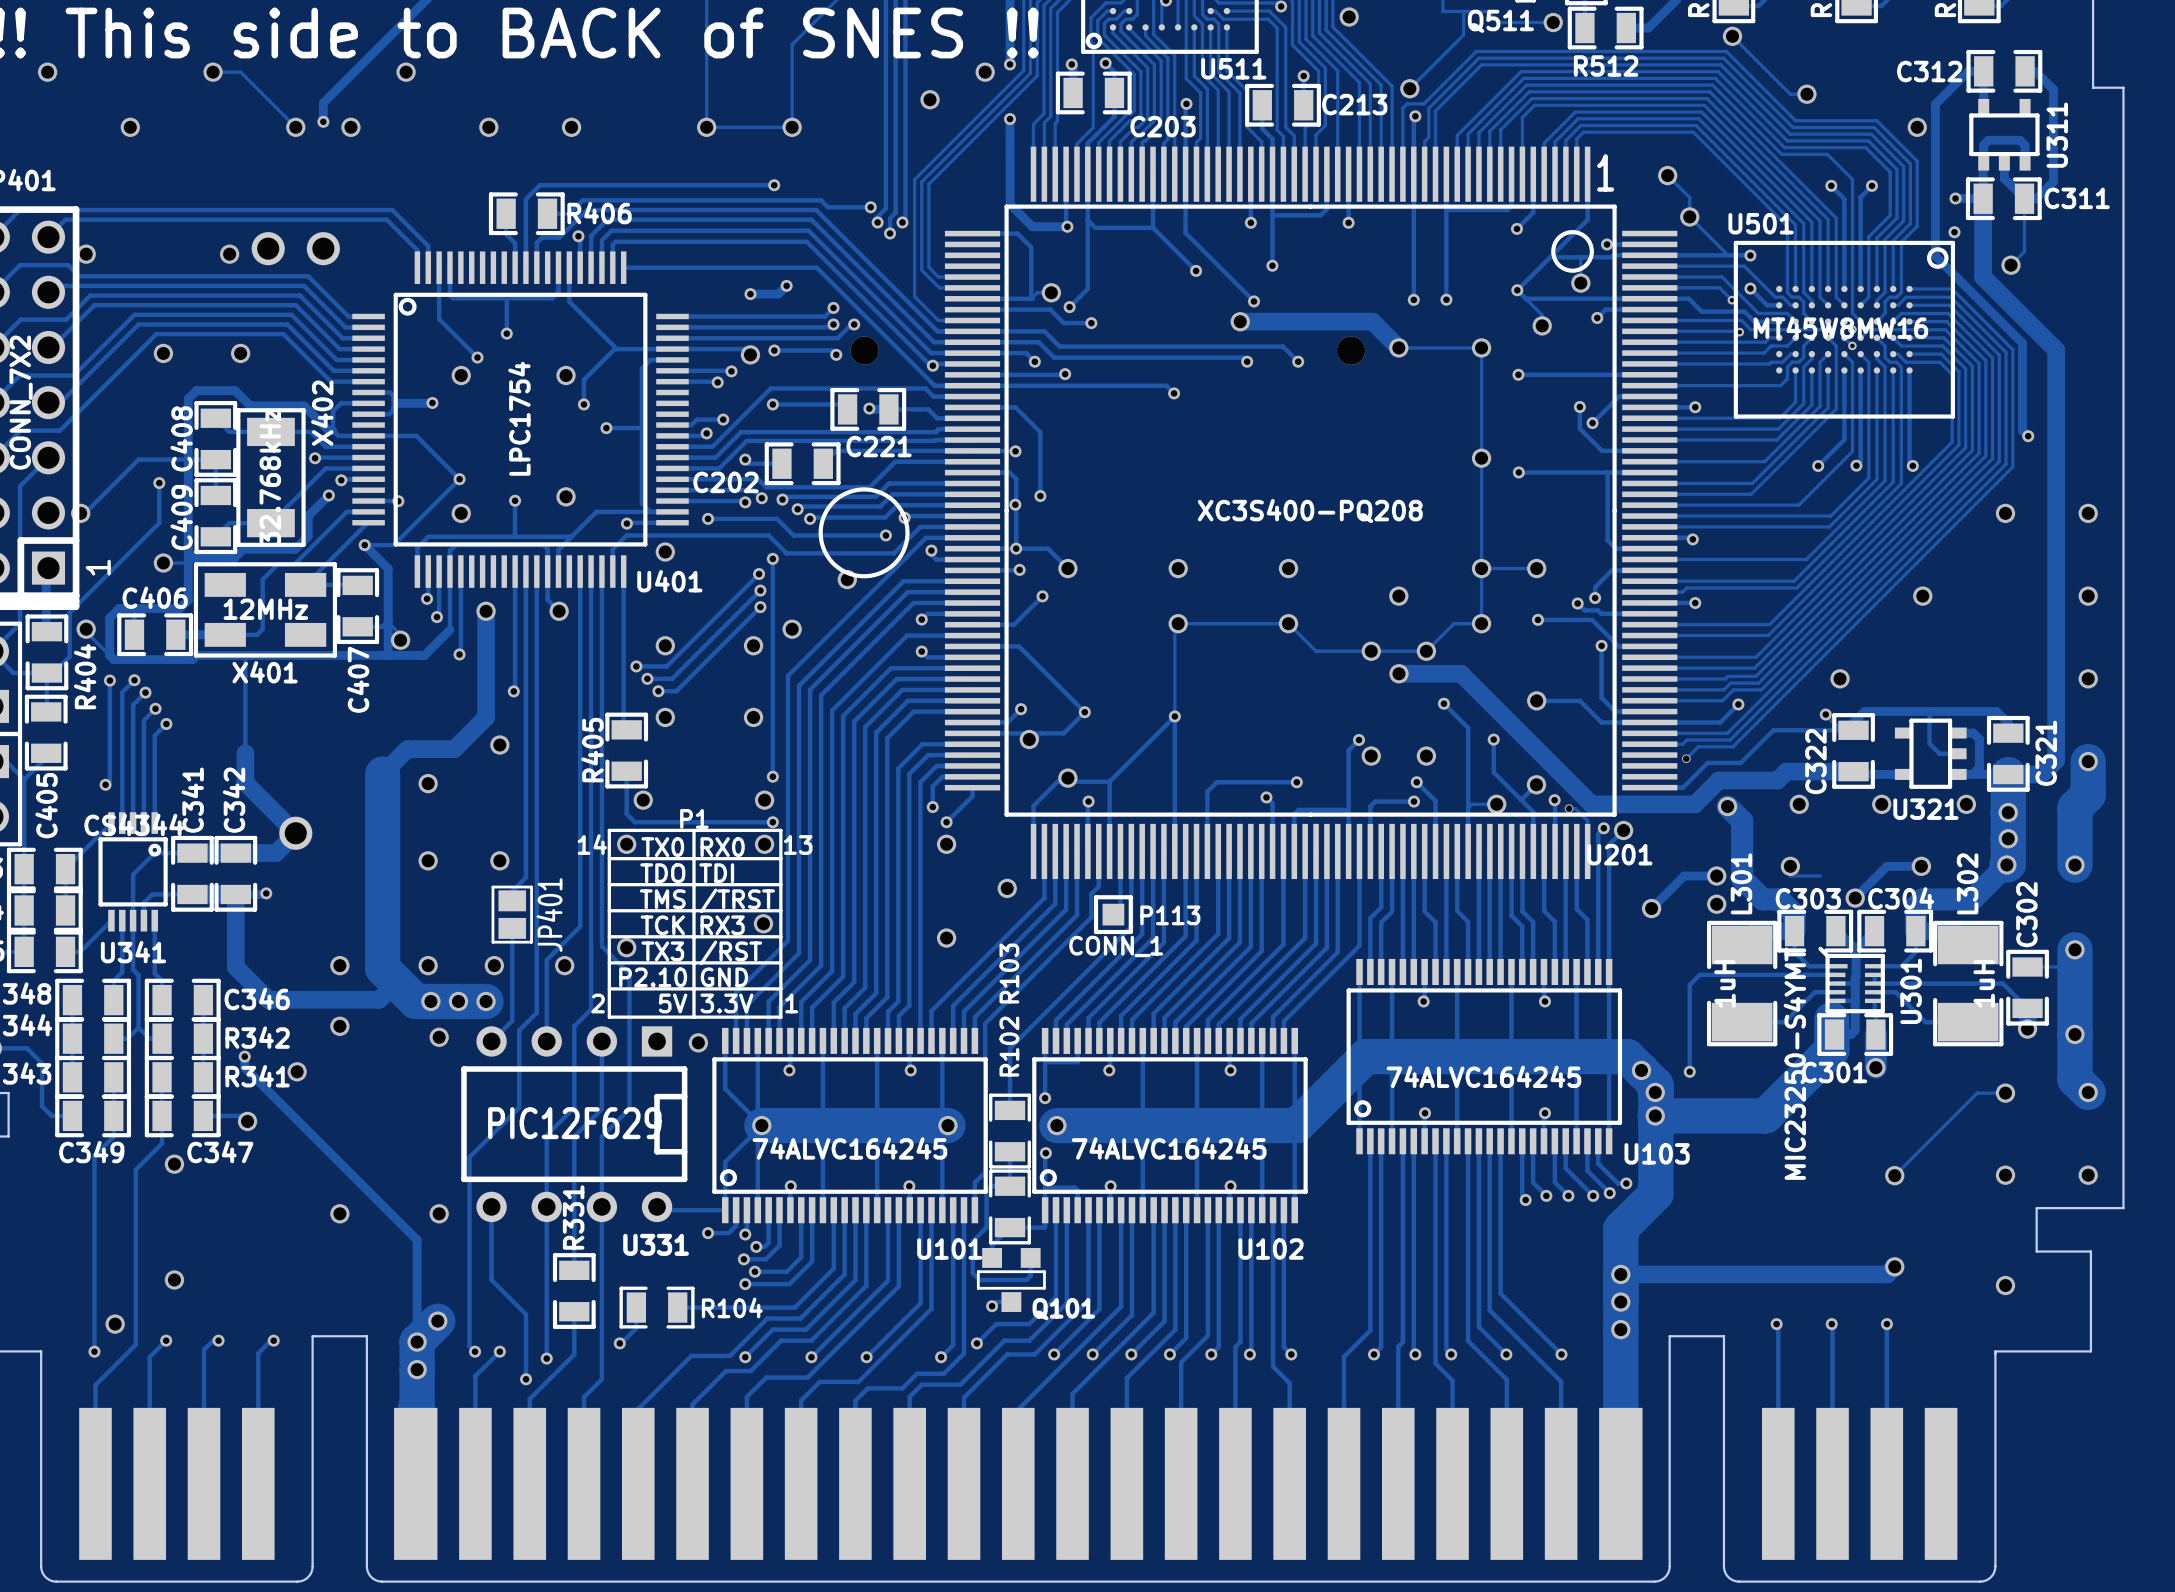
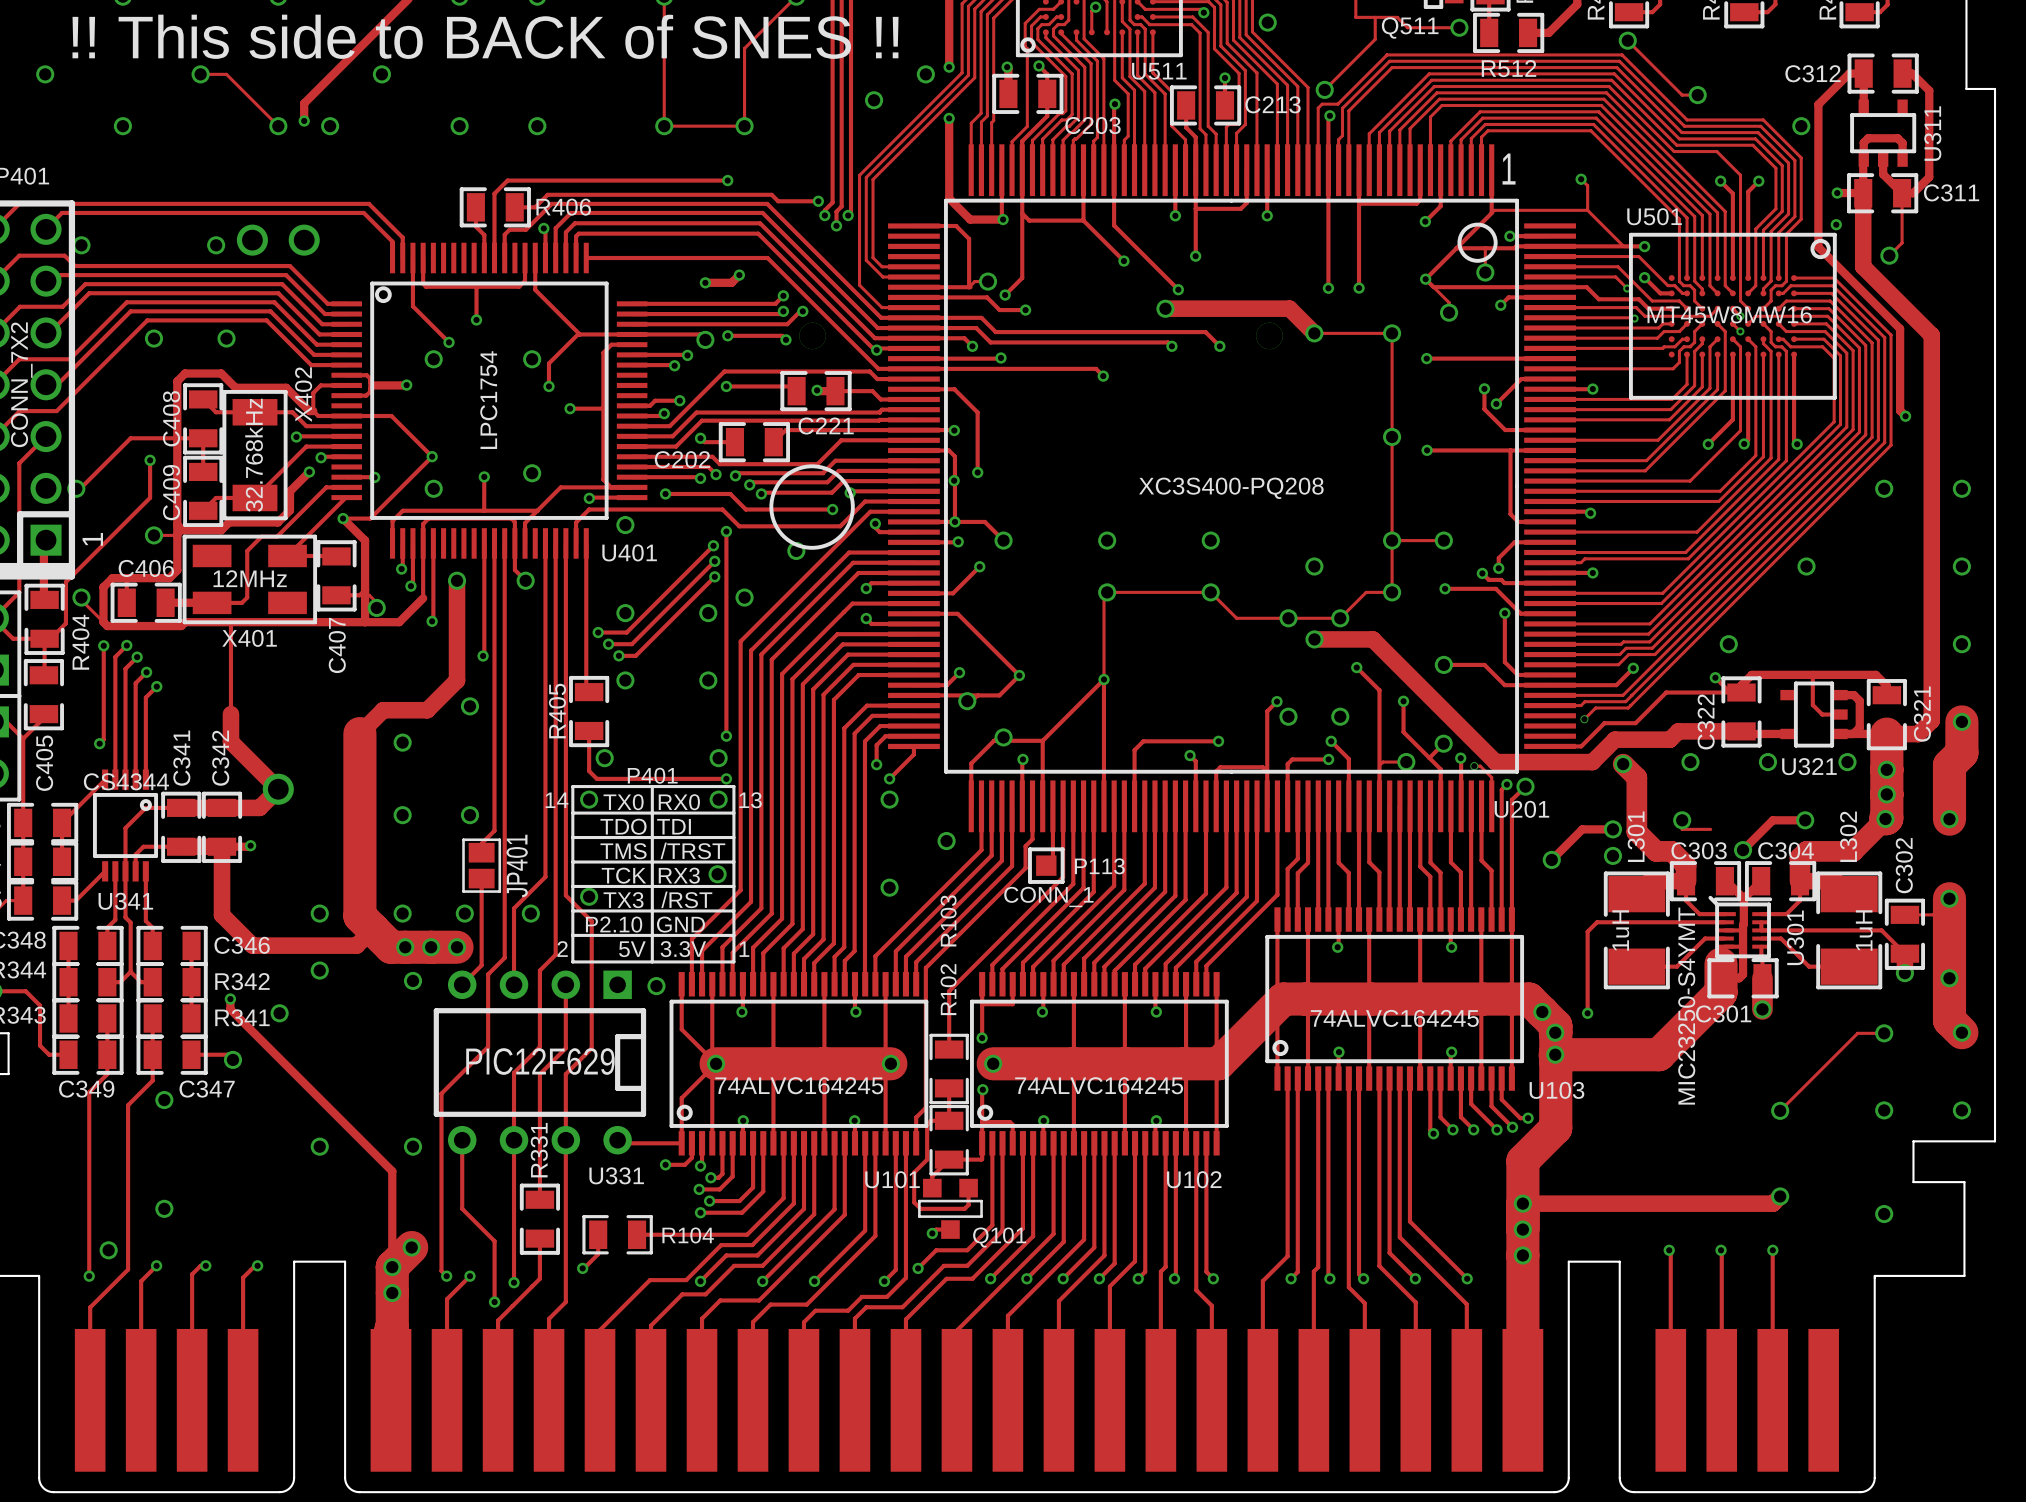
track: (1667, 175) (1689, 197) -> (1581, 179) (1587, 185) (1587, 192)
via position: (1667, 175) -> (1581, 179)
track: none -> (1587, 210) (1494, 210) (1491, 213)
via: (1689, 216) -> none
text: P1 (694, 818) -> P401 (652, 775)

